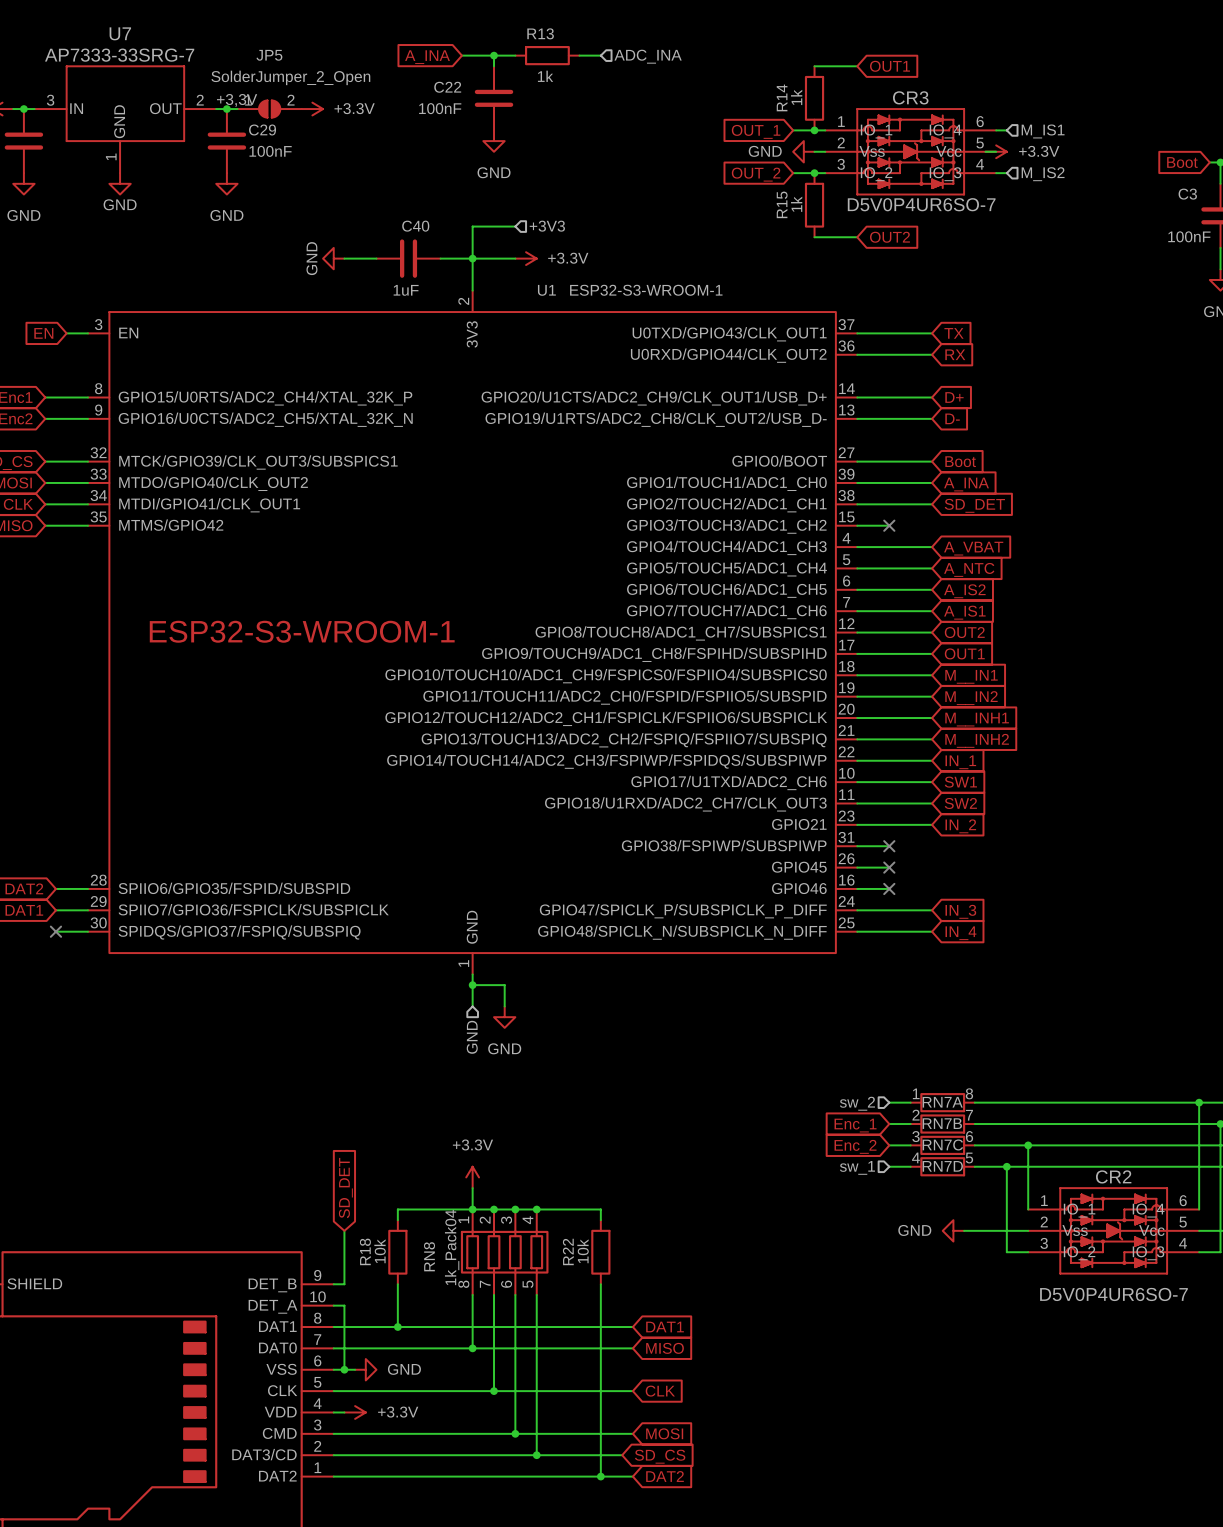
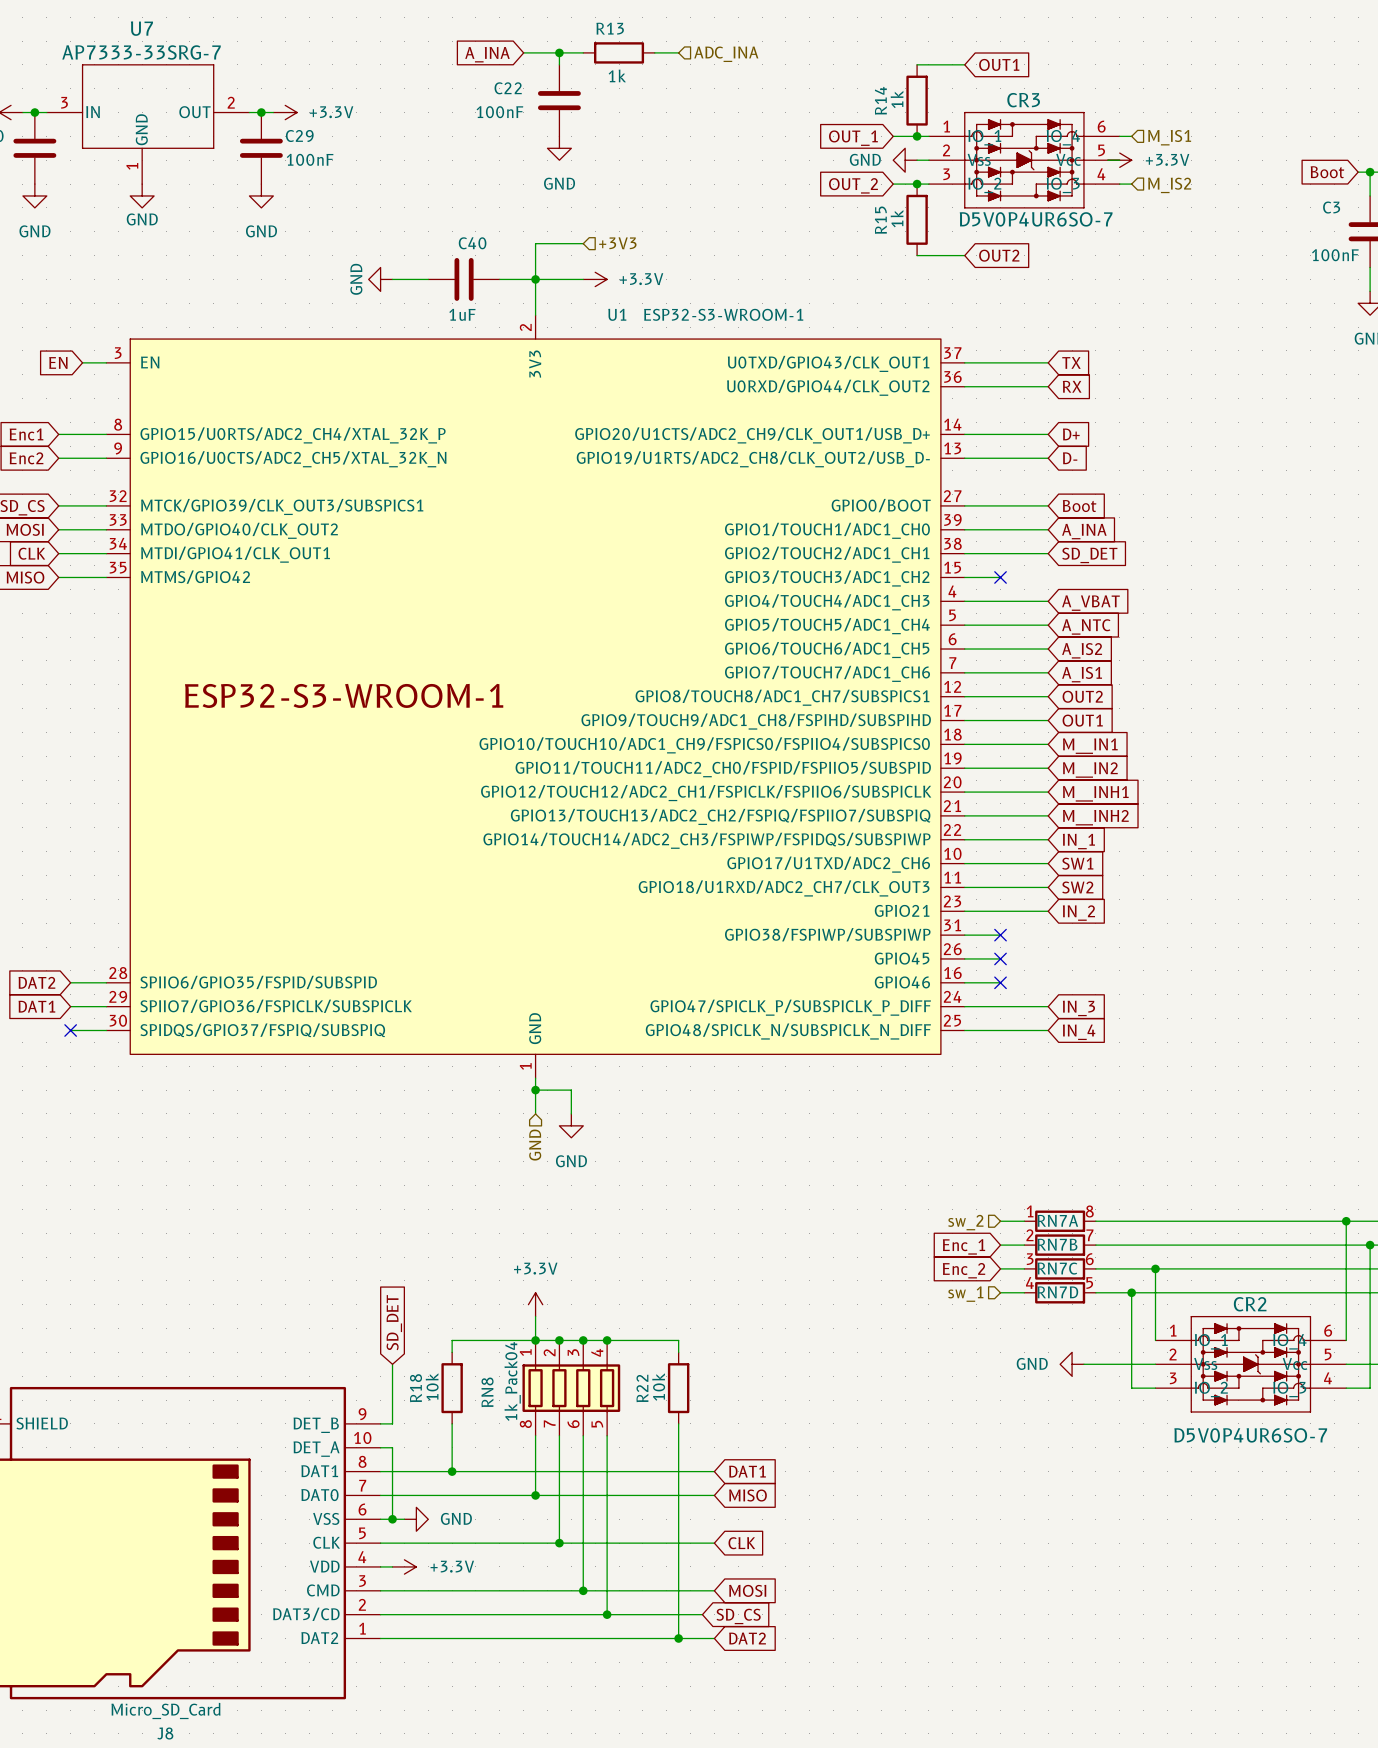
label: +3,3V (237, 100) -> none
JP5: SolderJumper_2_Open (269, 109) -> none
power symbol position: +3.3V (312, 109) -> +3.3V (285, 112)

